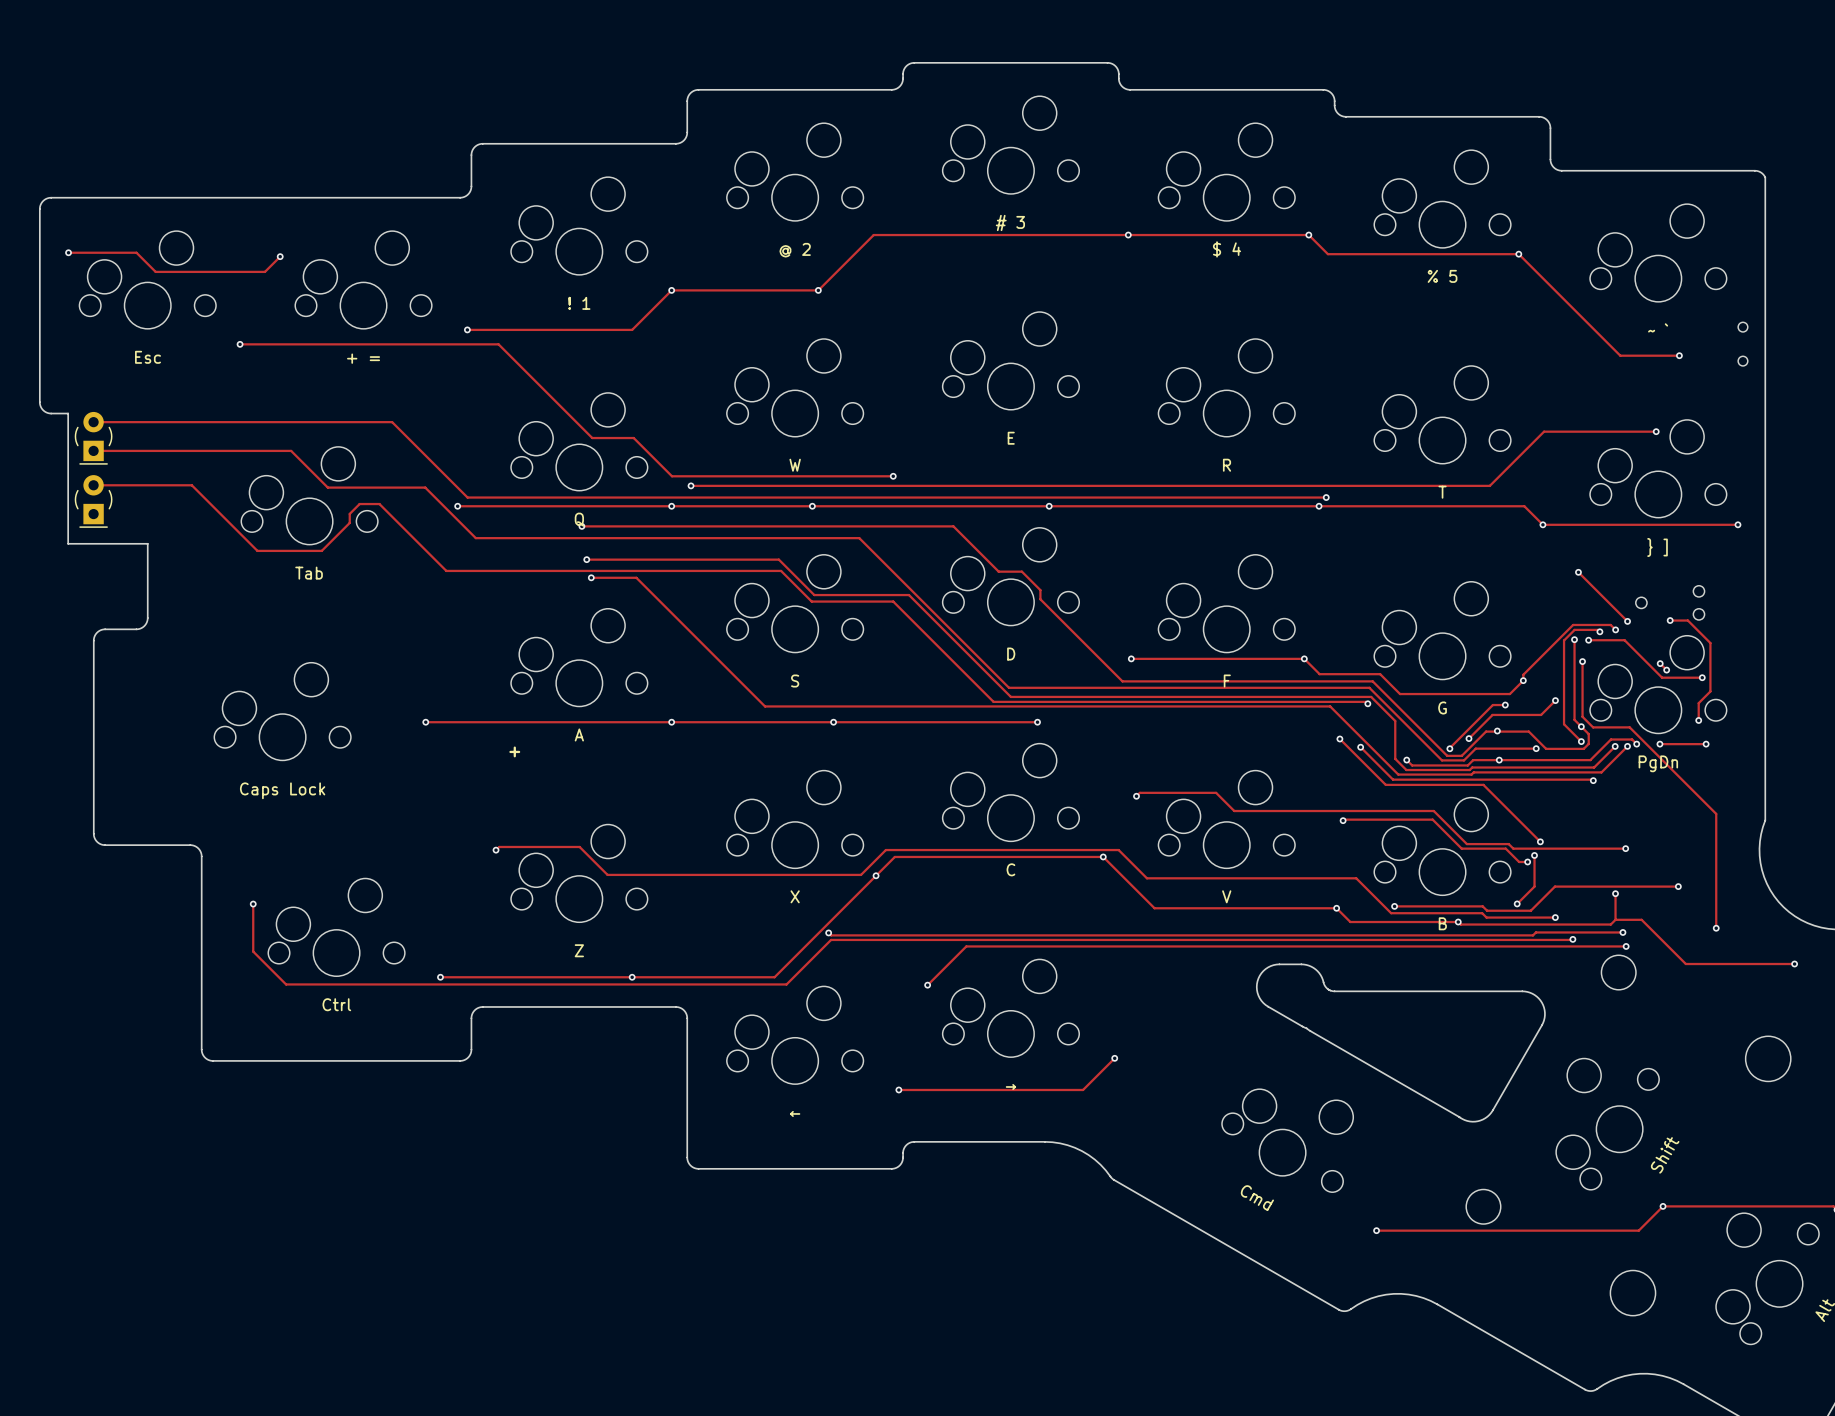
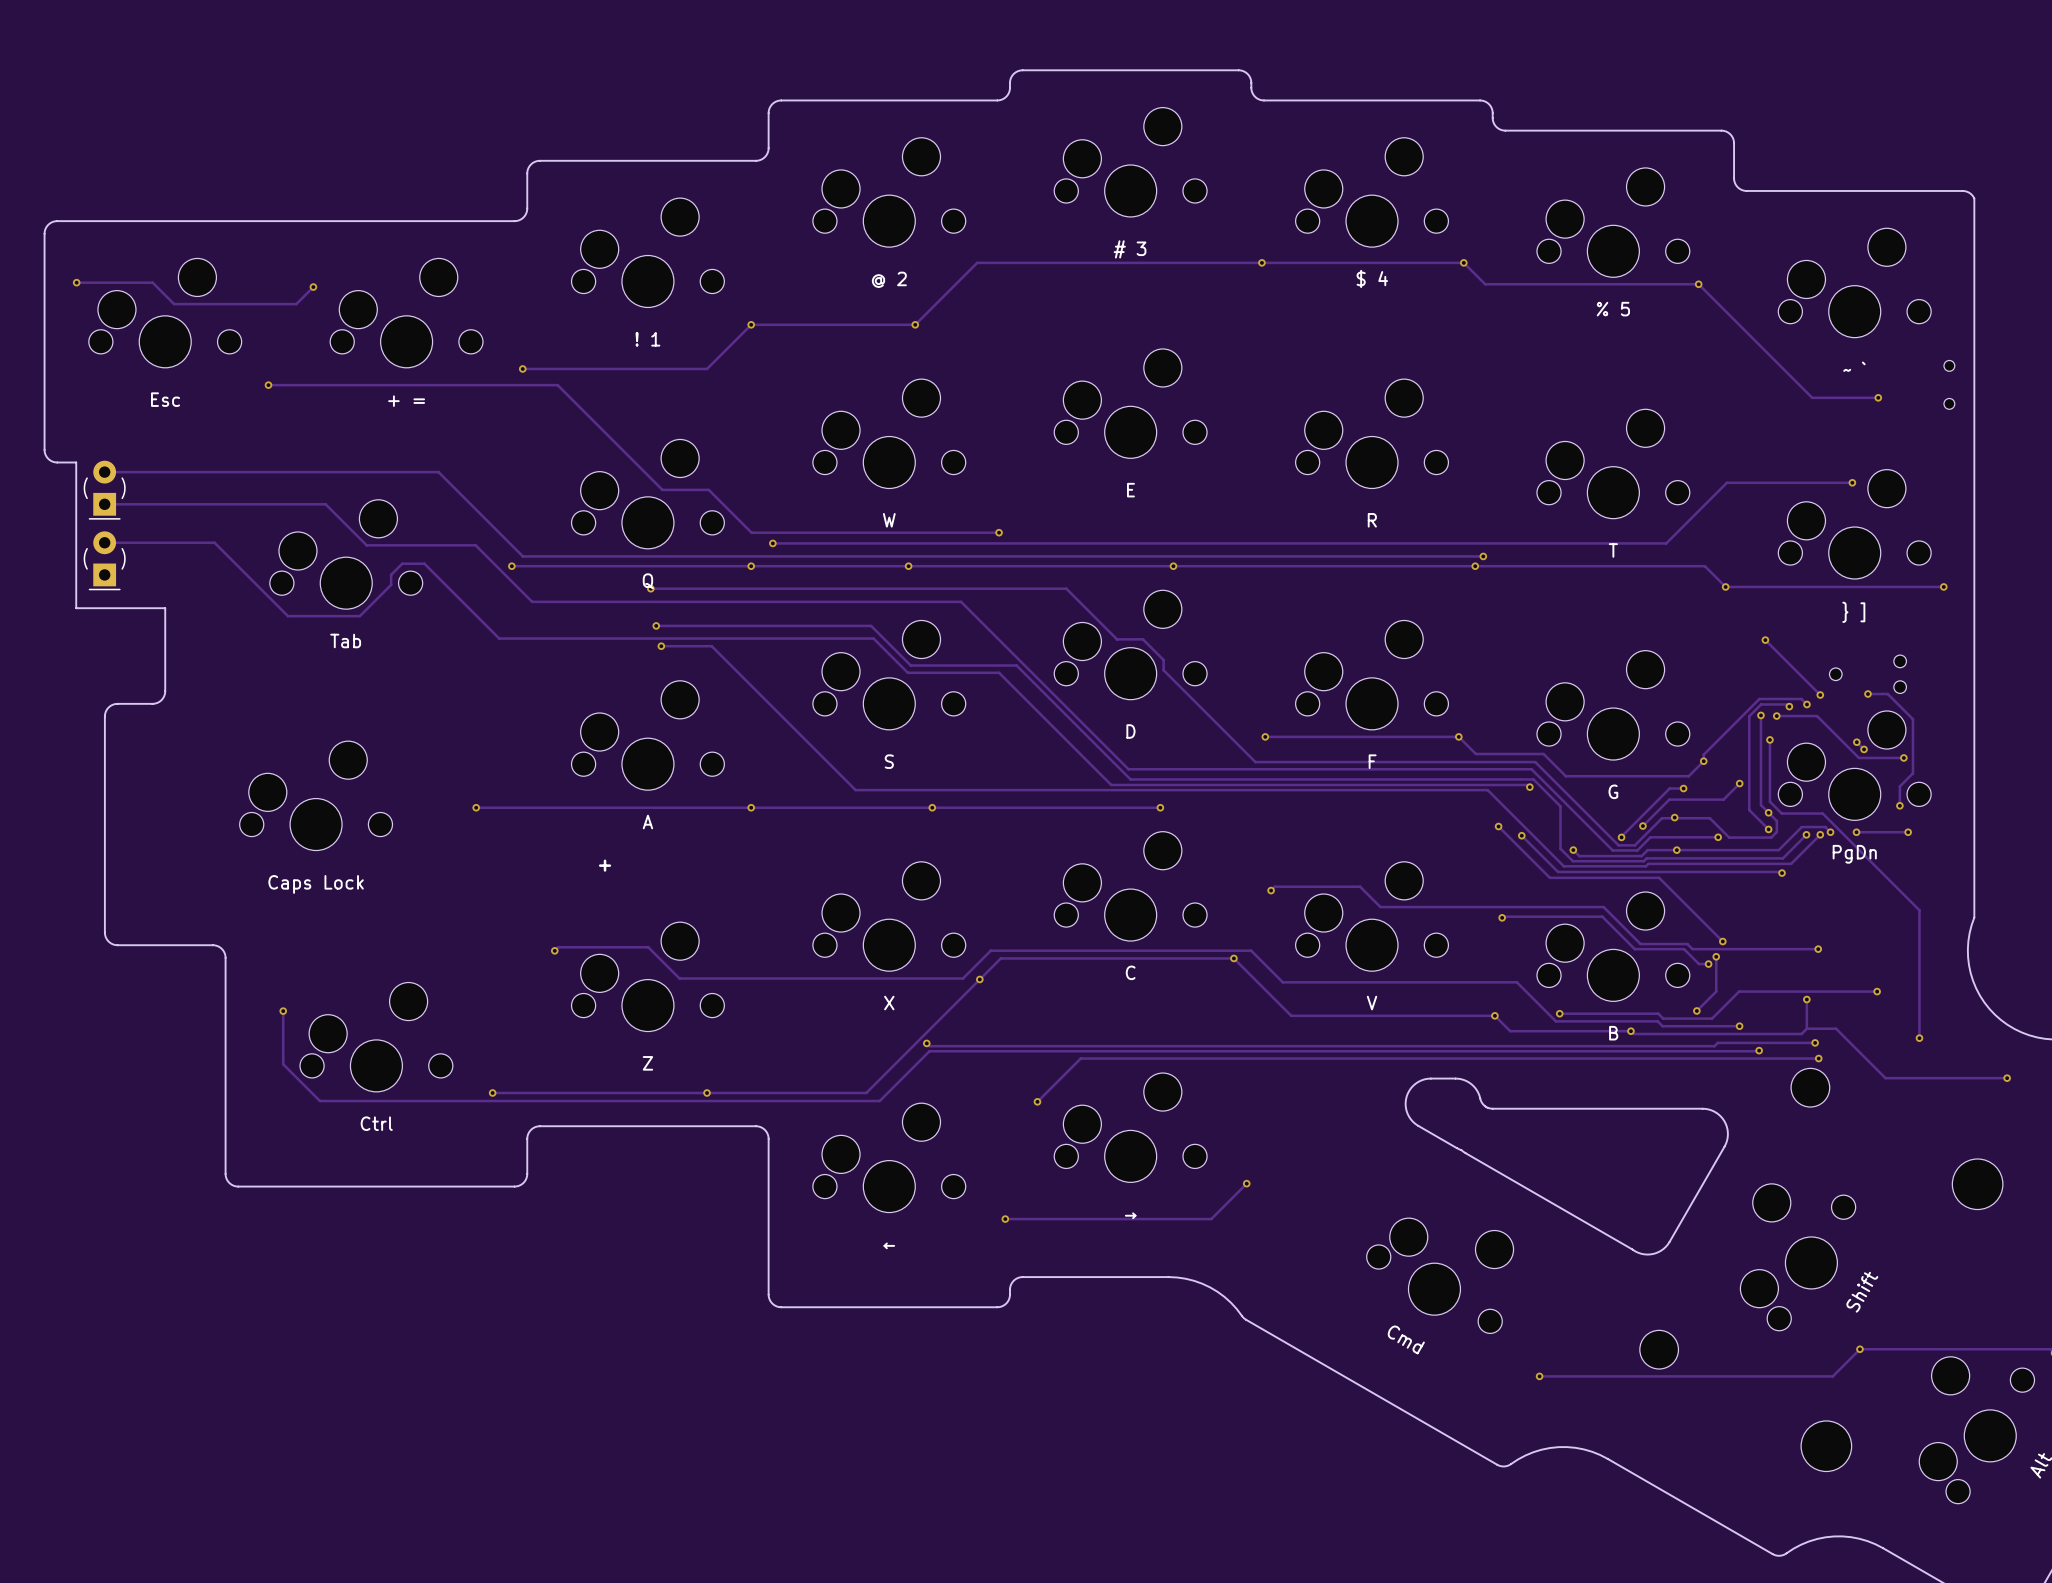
part position: (514, 751) -> (605, 865)

